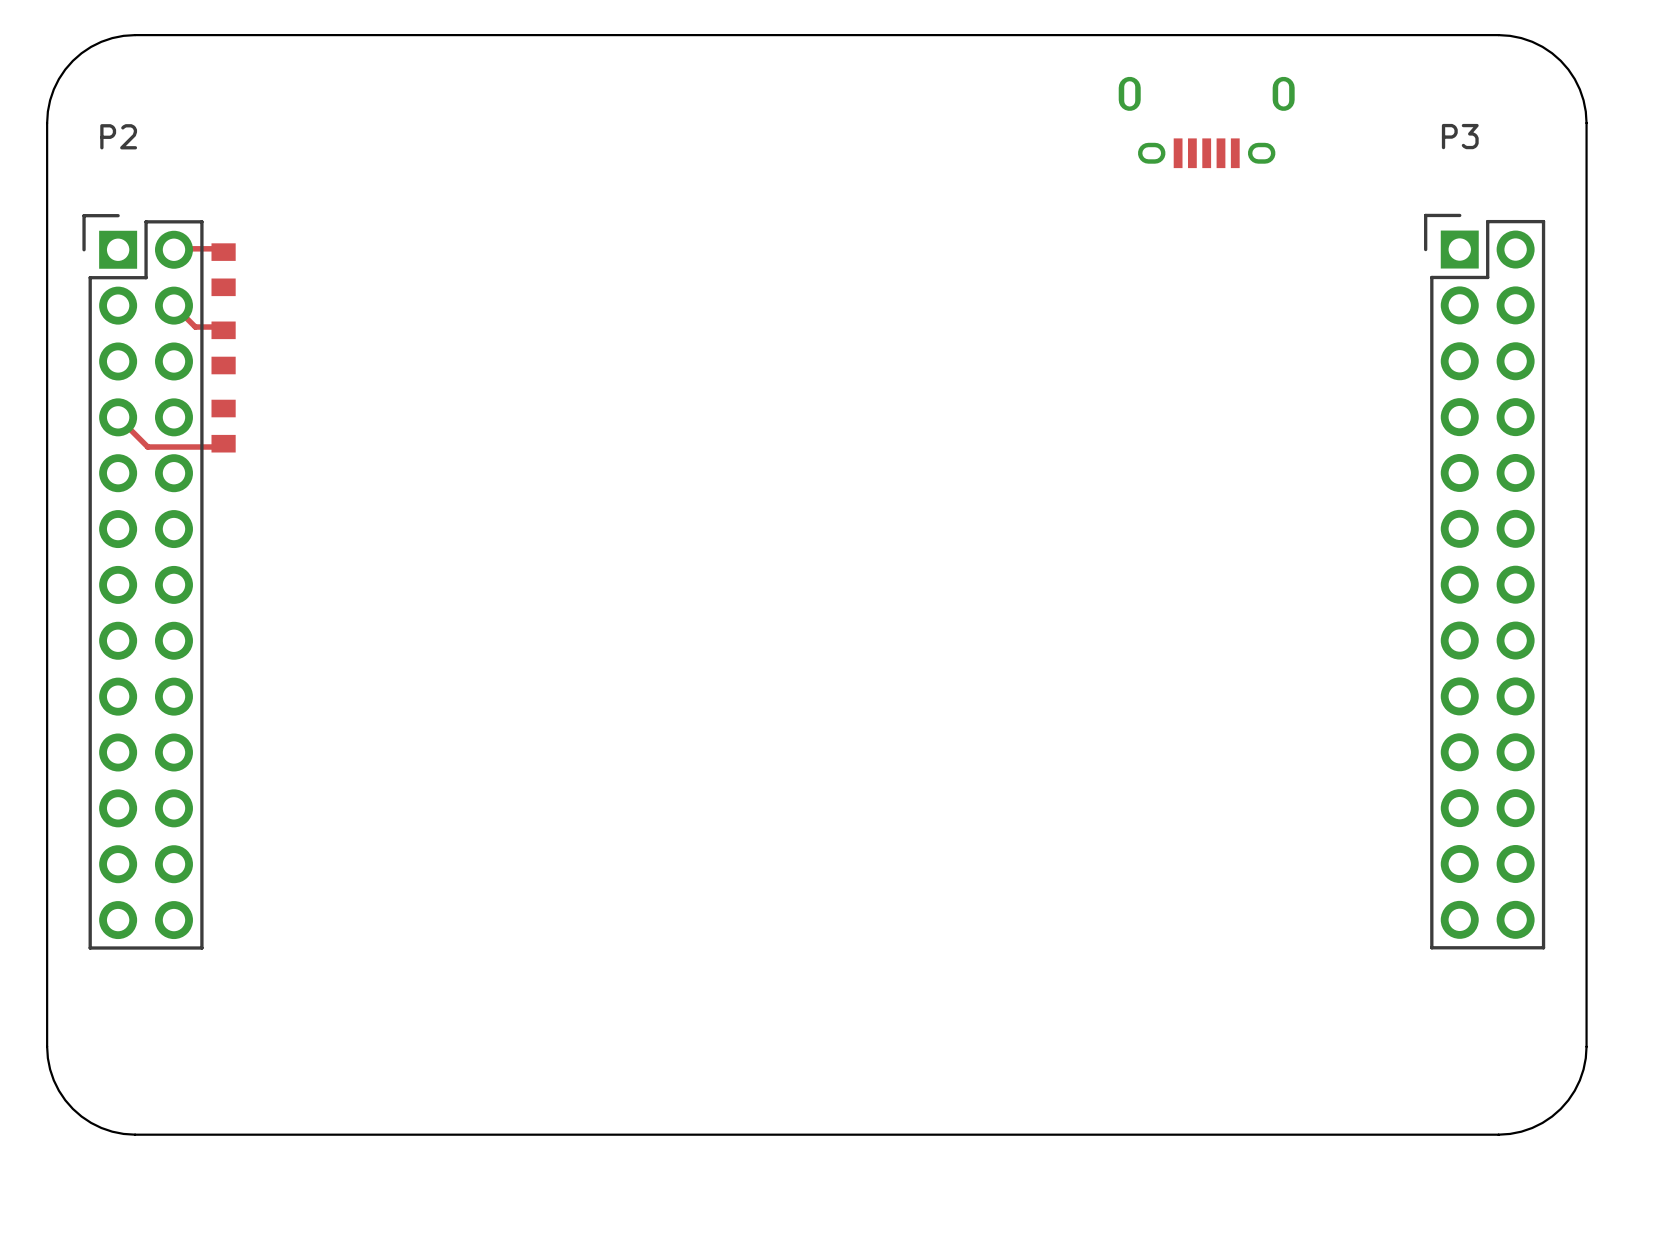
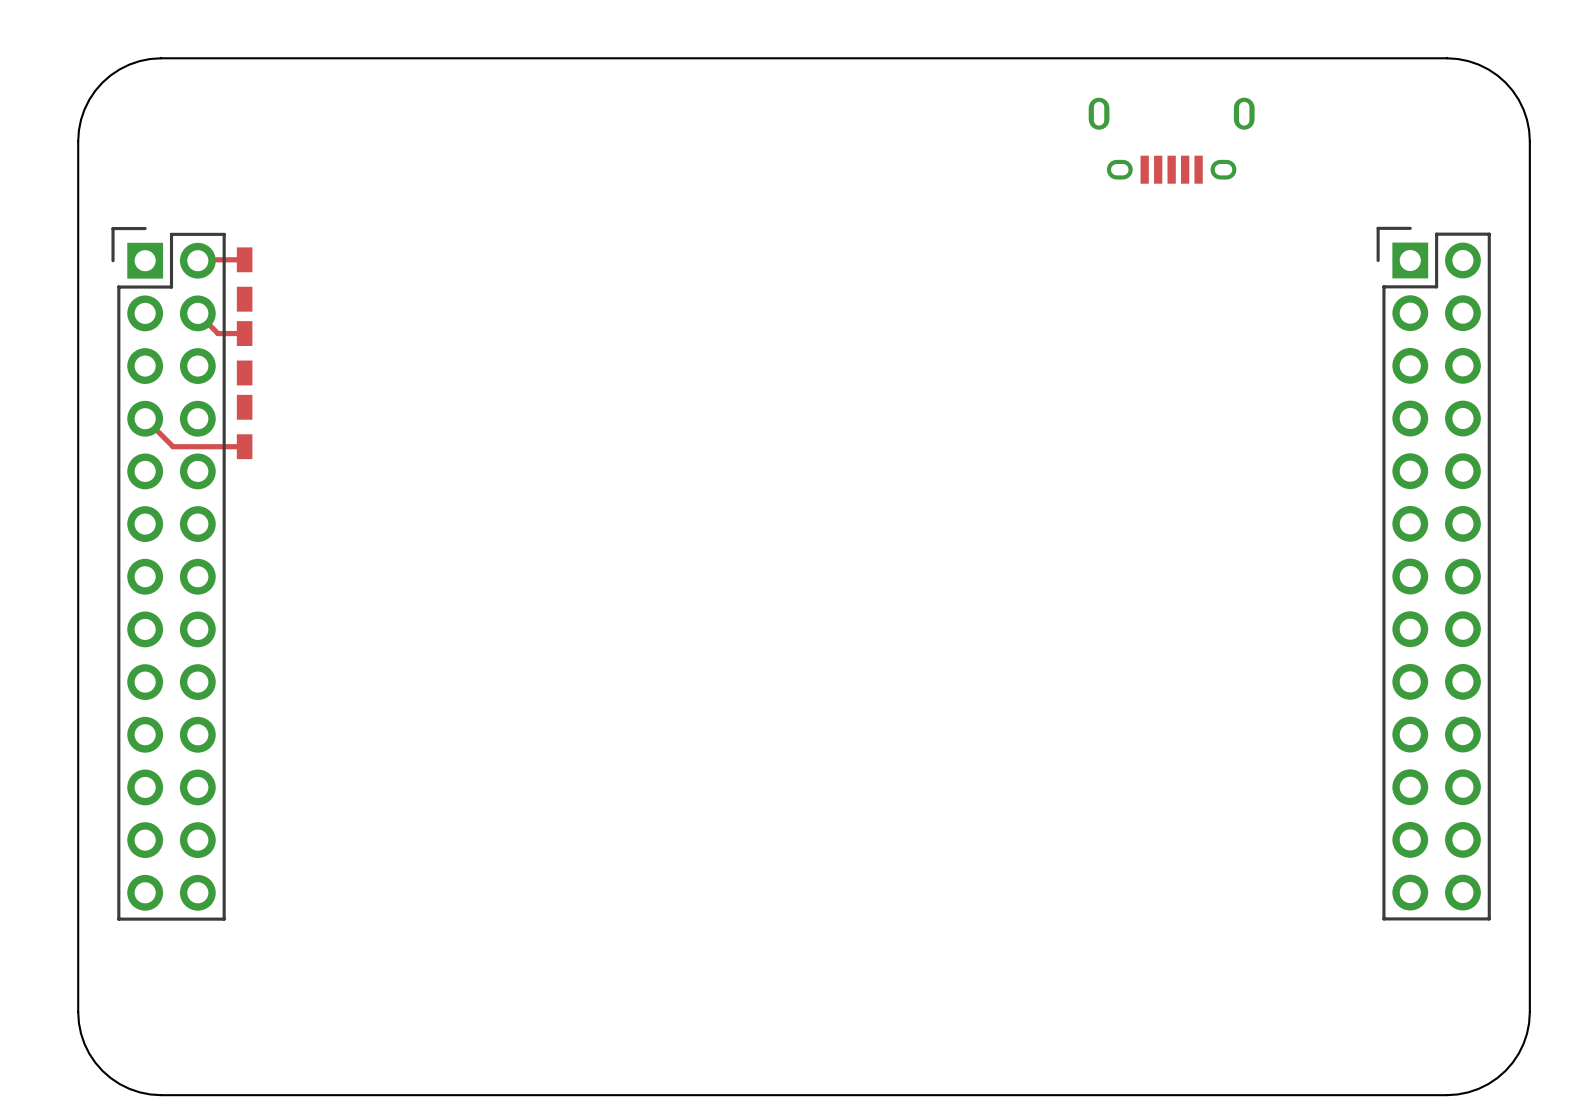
P2 name: P2 (118, 136) -> none
P3 name: P3 (1460, 136) -> none
part footprint: [211, 243, 236, 297] -> [236, 247, 253, 312]
part footprint: [211, 321, 236, 375] -> [236, 321, 253, 386]
part footprint: [211, 399, 236, 453] -> [236, 394, 253, 460]

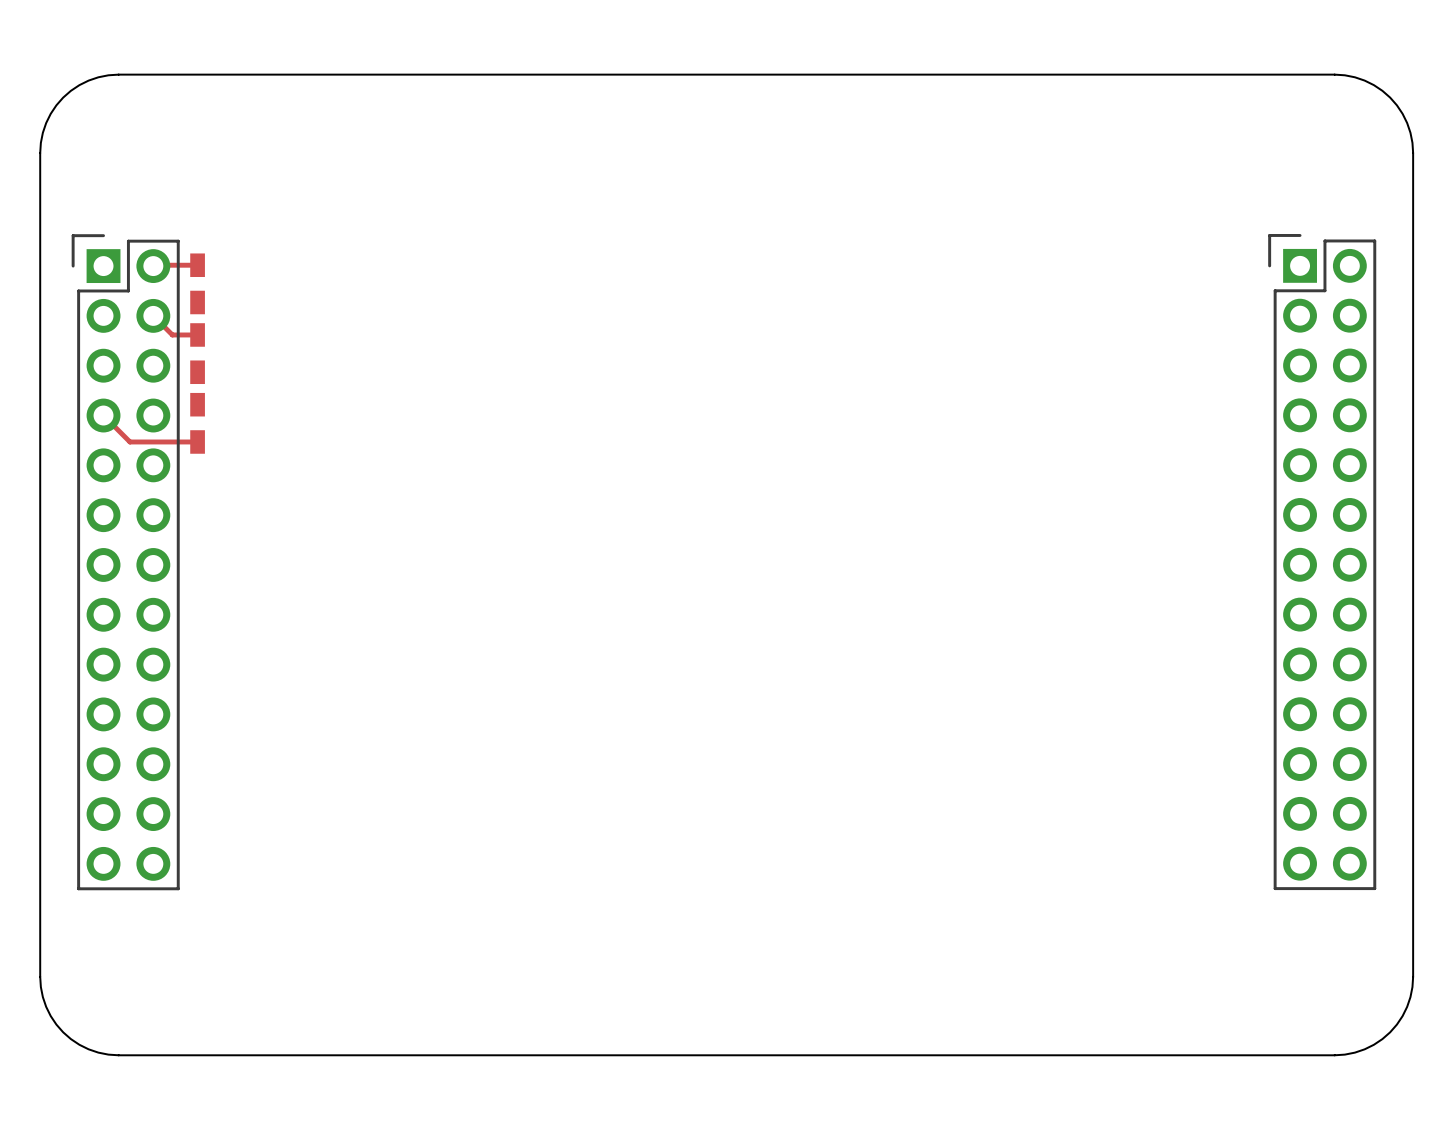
part: (1171, 140) -> none

